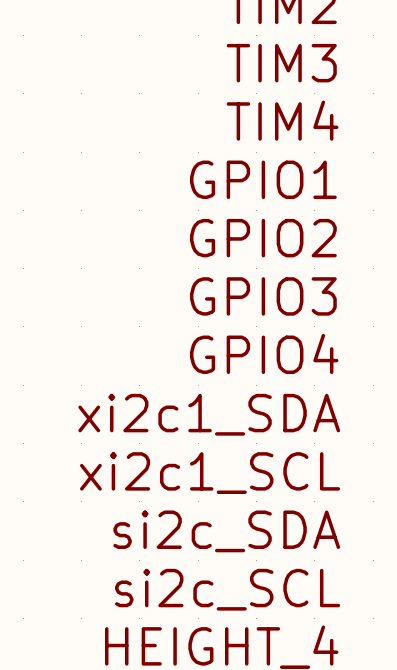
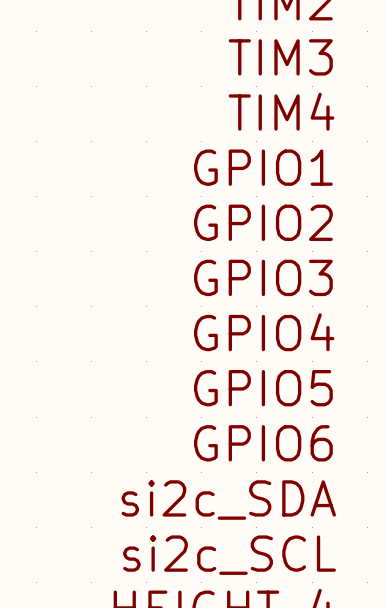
label: xi2c1_SDA (209, 414) -> GPIO5 (263, 388)
label: xi2c1_SCL (210, 473) -> GPIO6 (263, 443)

